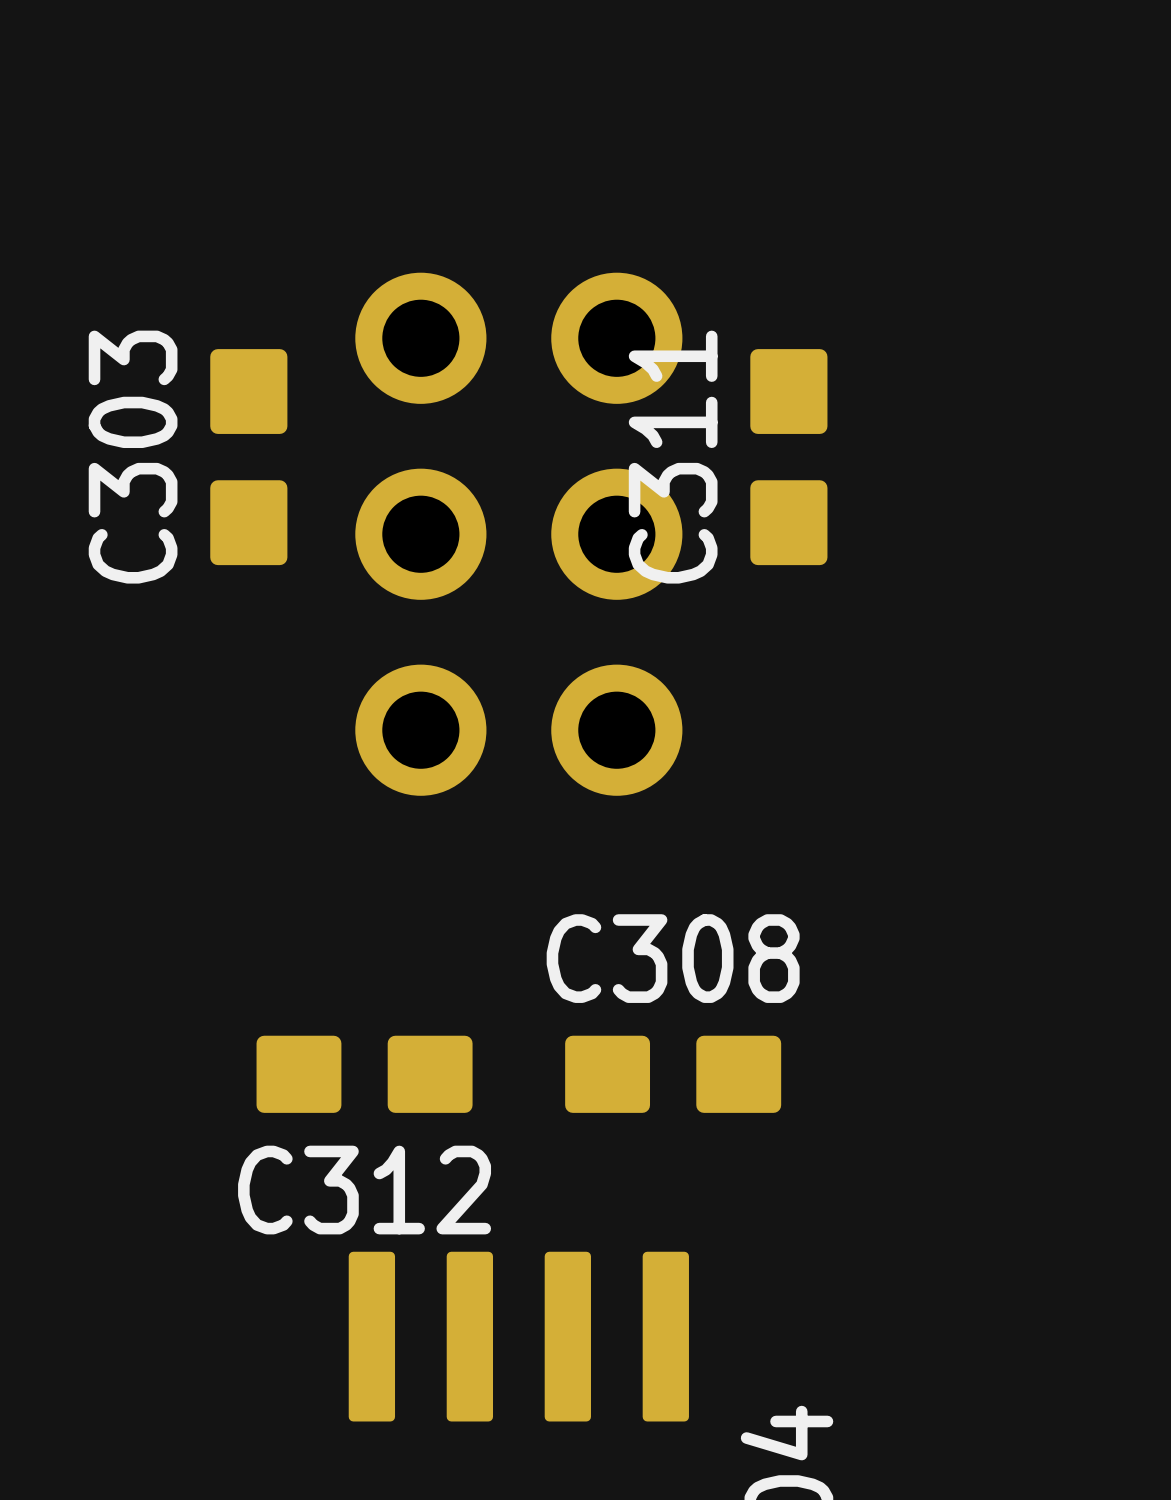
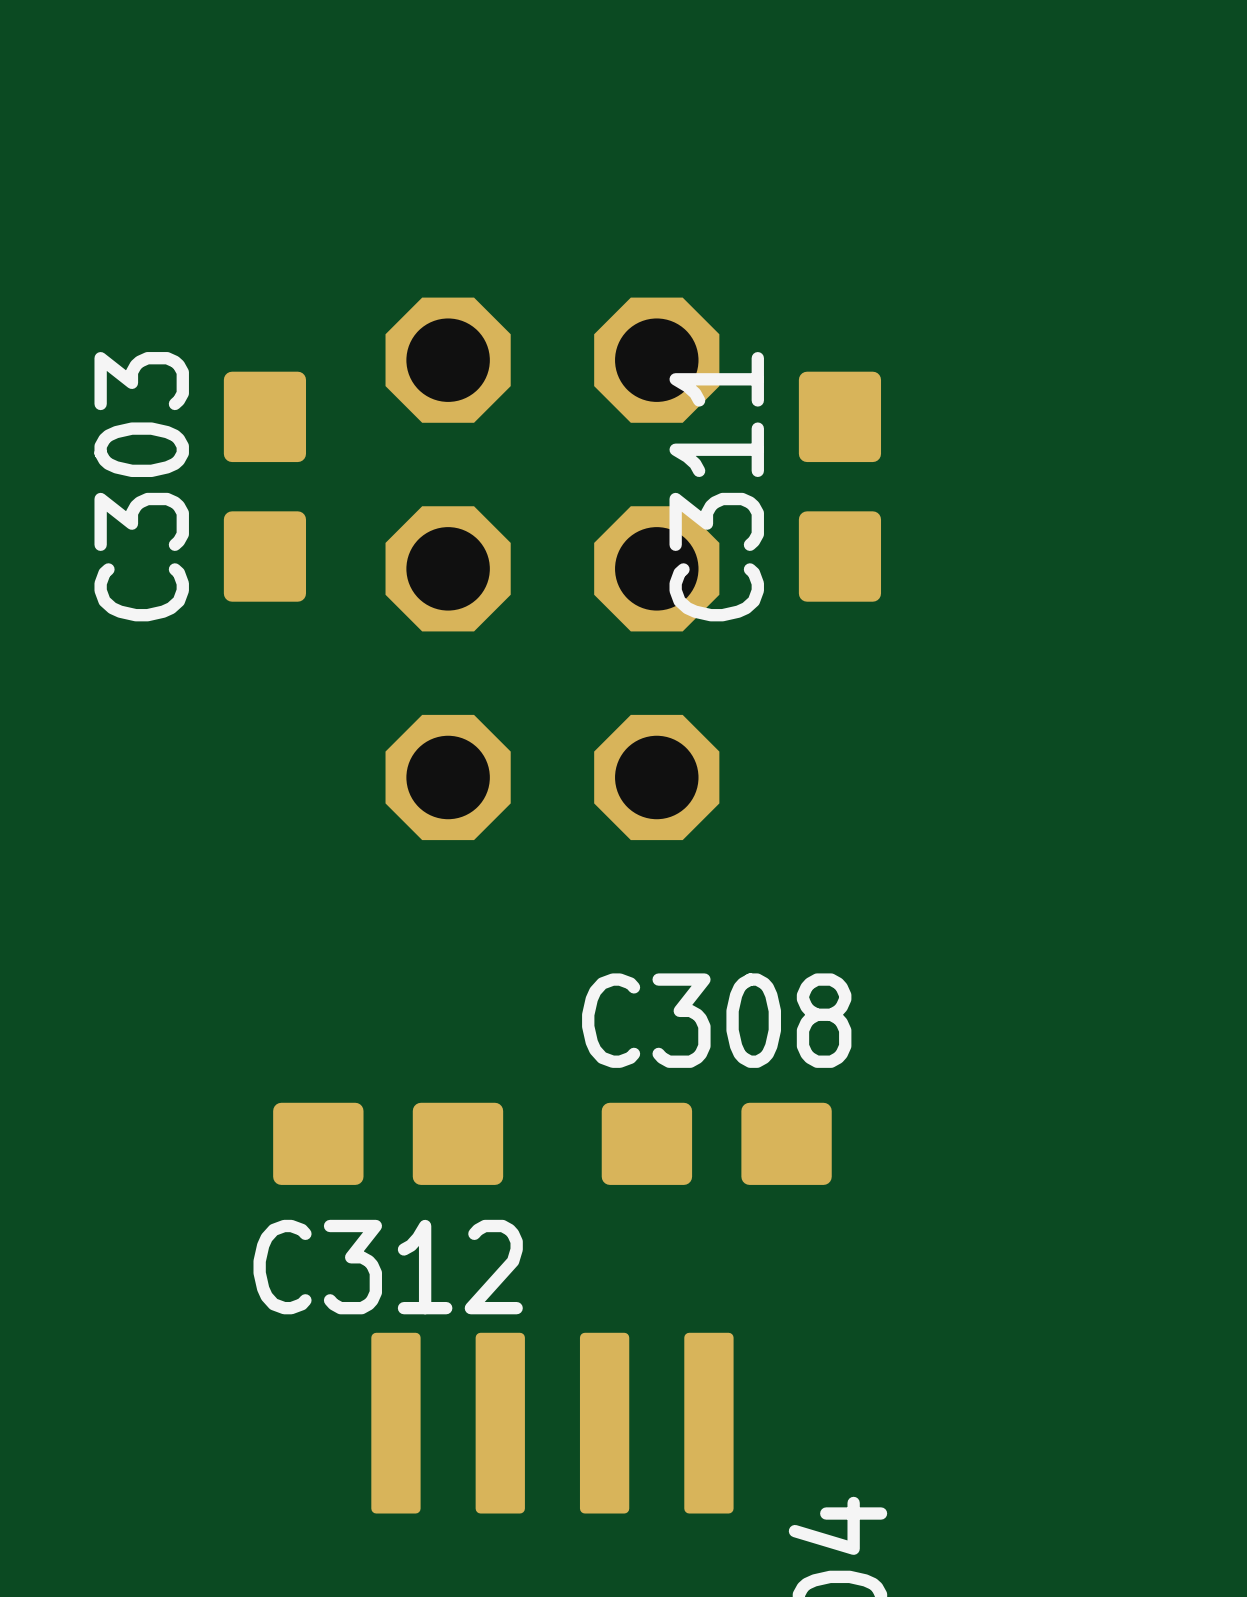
part footprint: [355, 272, 683, 796] -> [385, 297, 720, 841]

